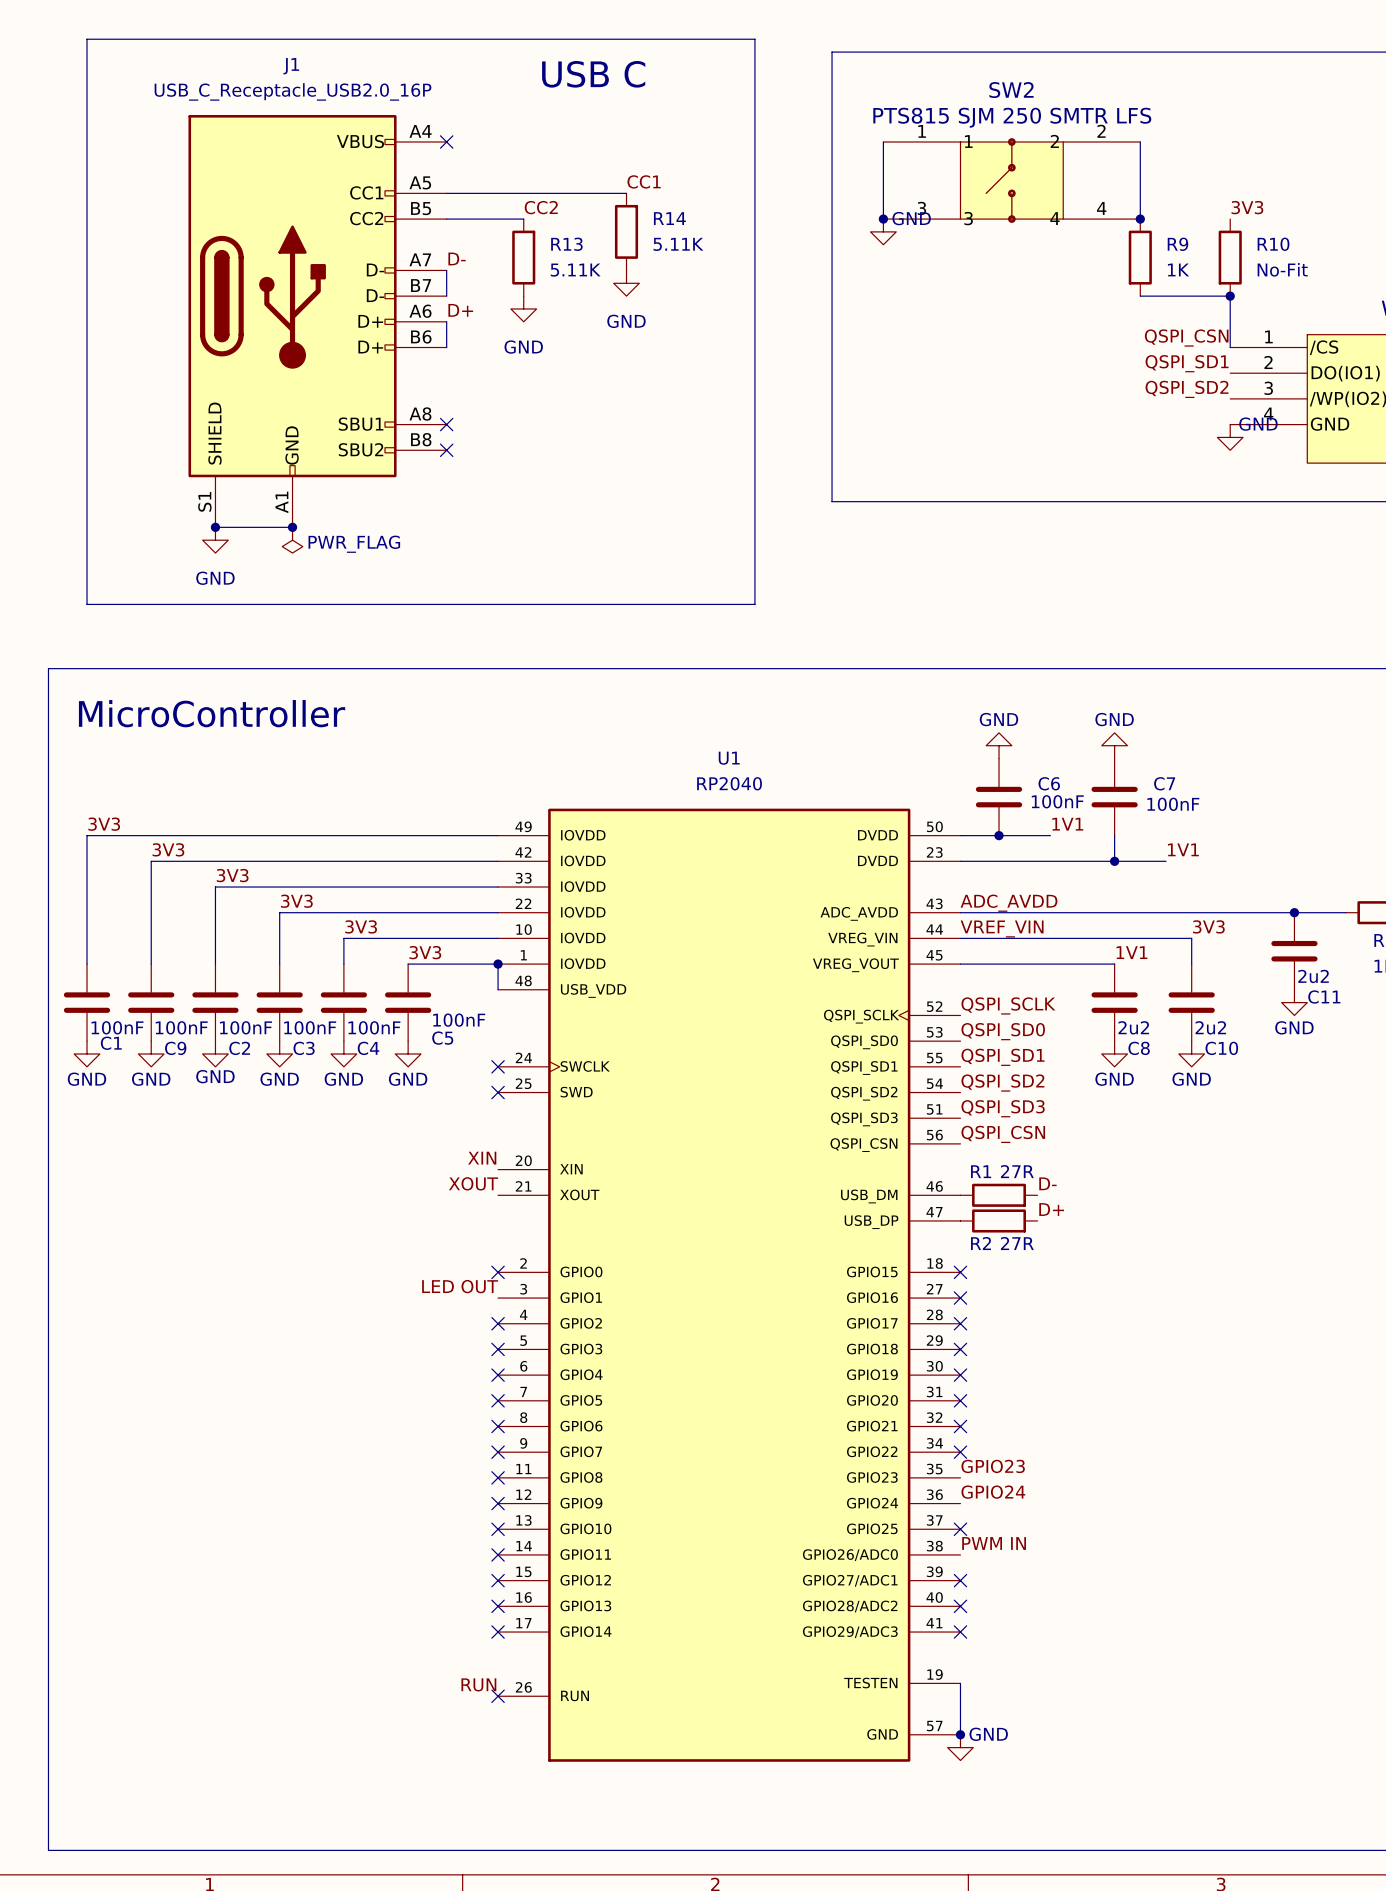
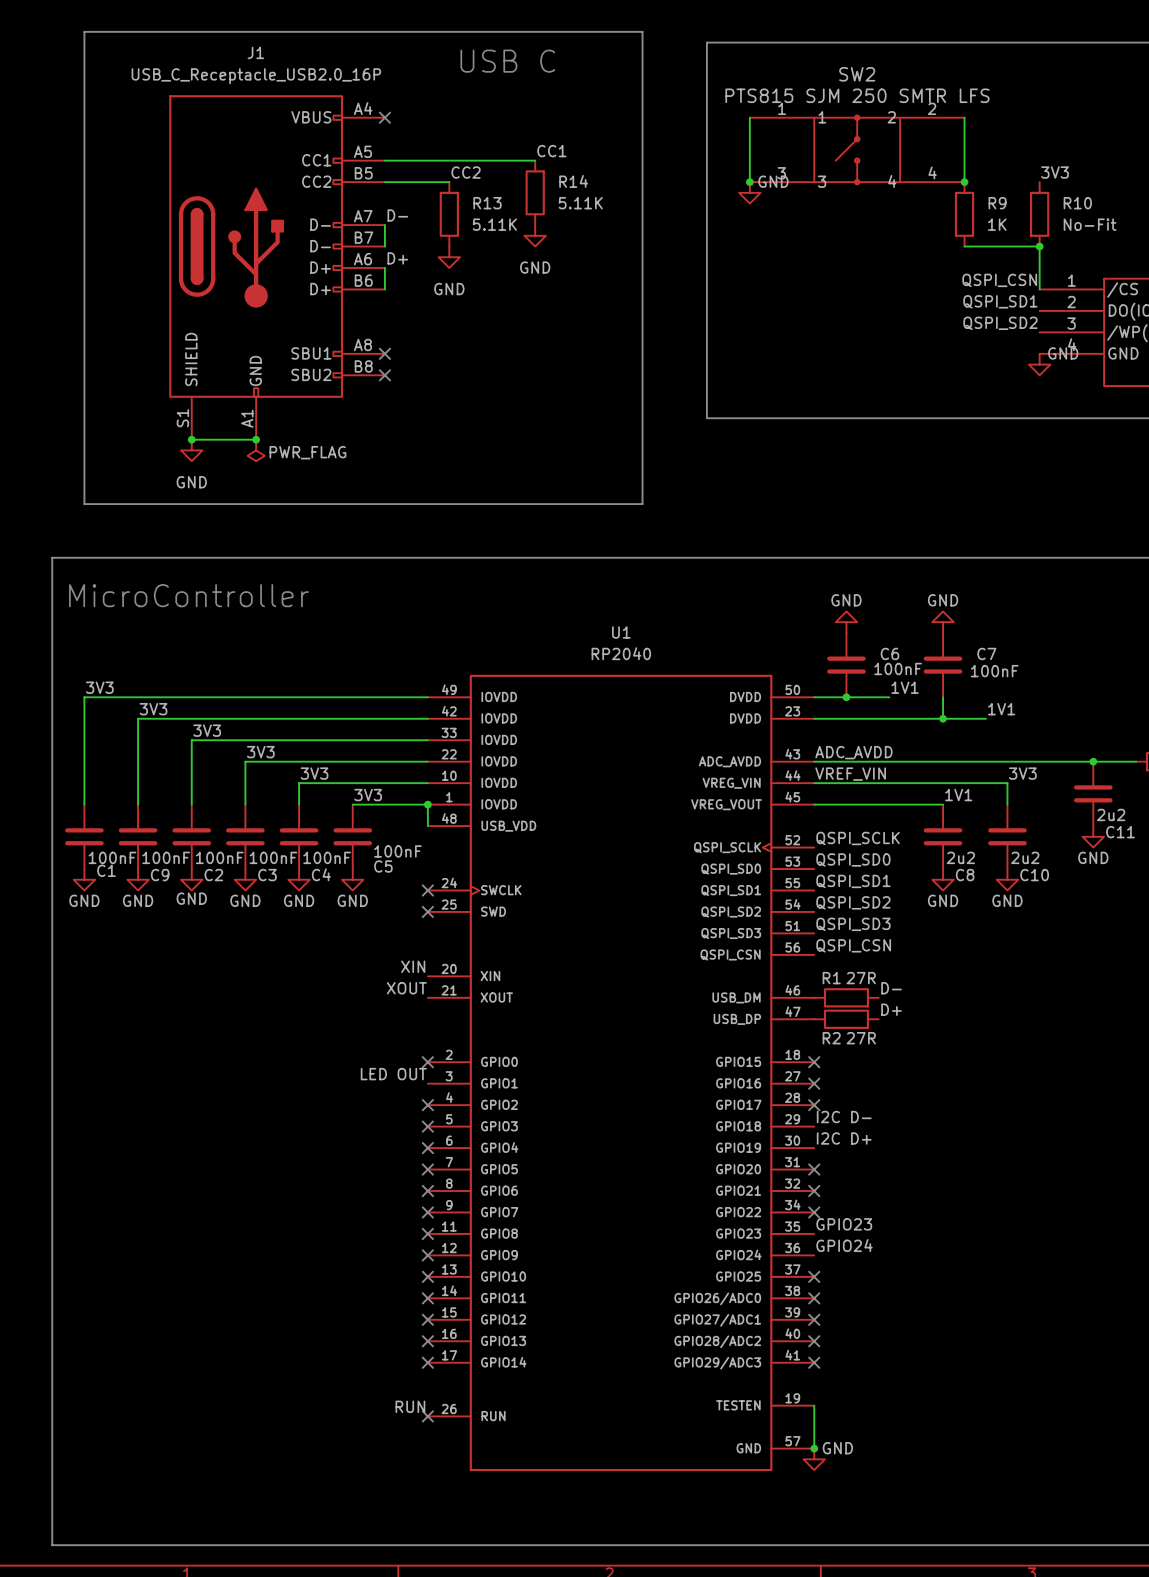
label: none -> I2C D- (844, 1117)
no-connect mark: (960, 1349) -> none
label: none -> I2C D+ (844, 1138)
no-connect mark: (960, 1375) -> none
label: PWM IN (994, 1543) -> none
no-connect mark: none -> (814, 1298)

